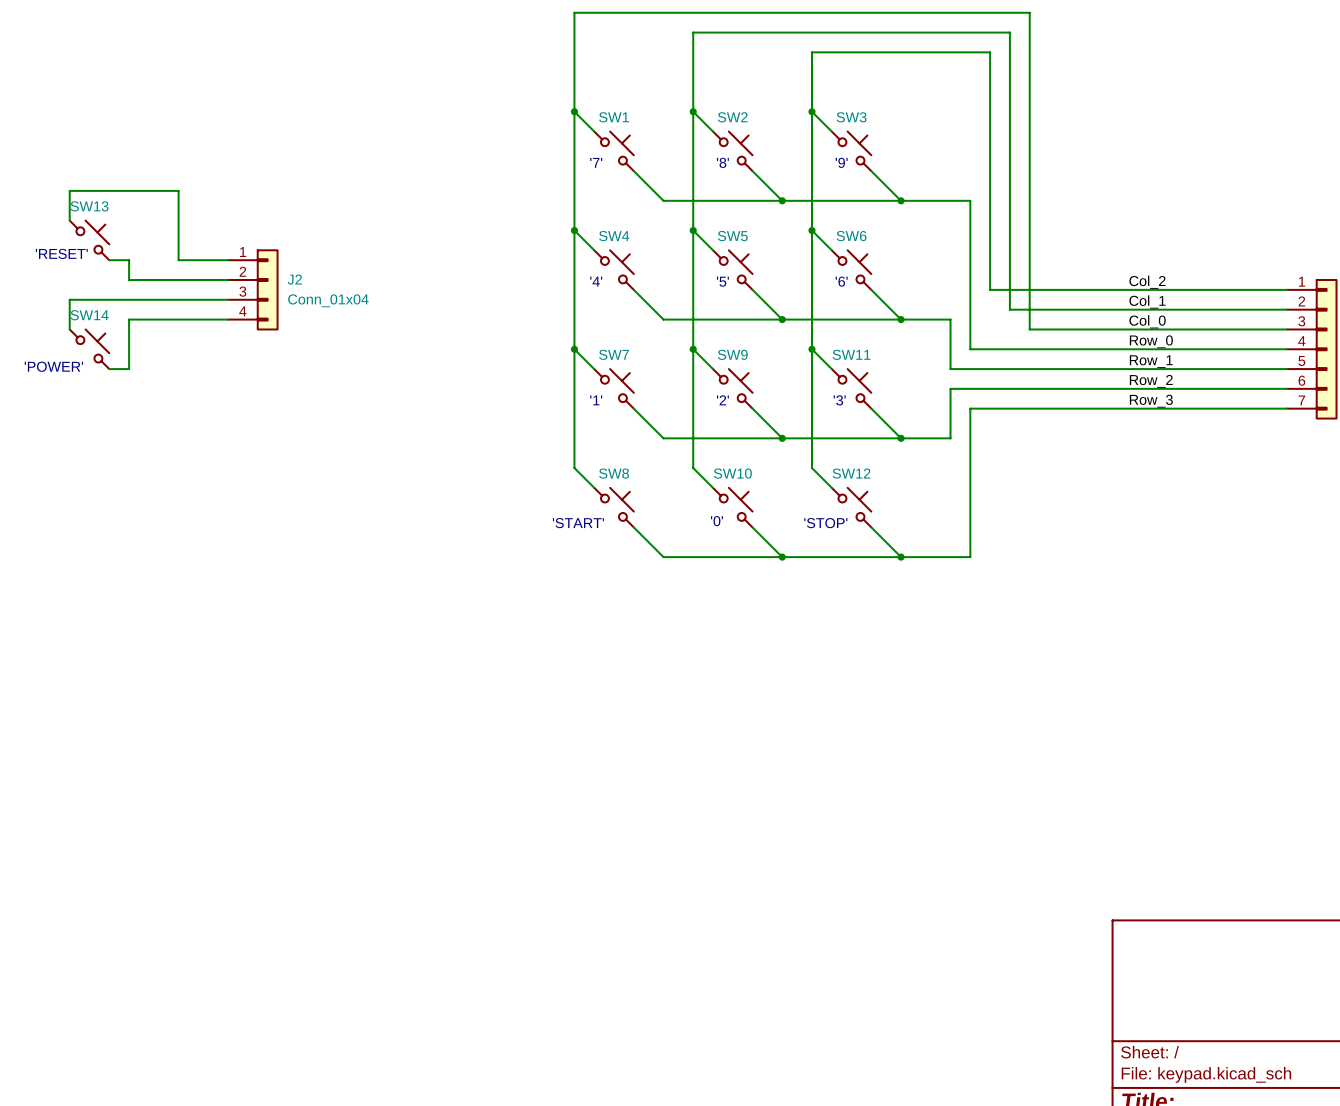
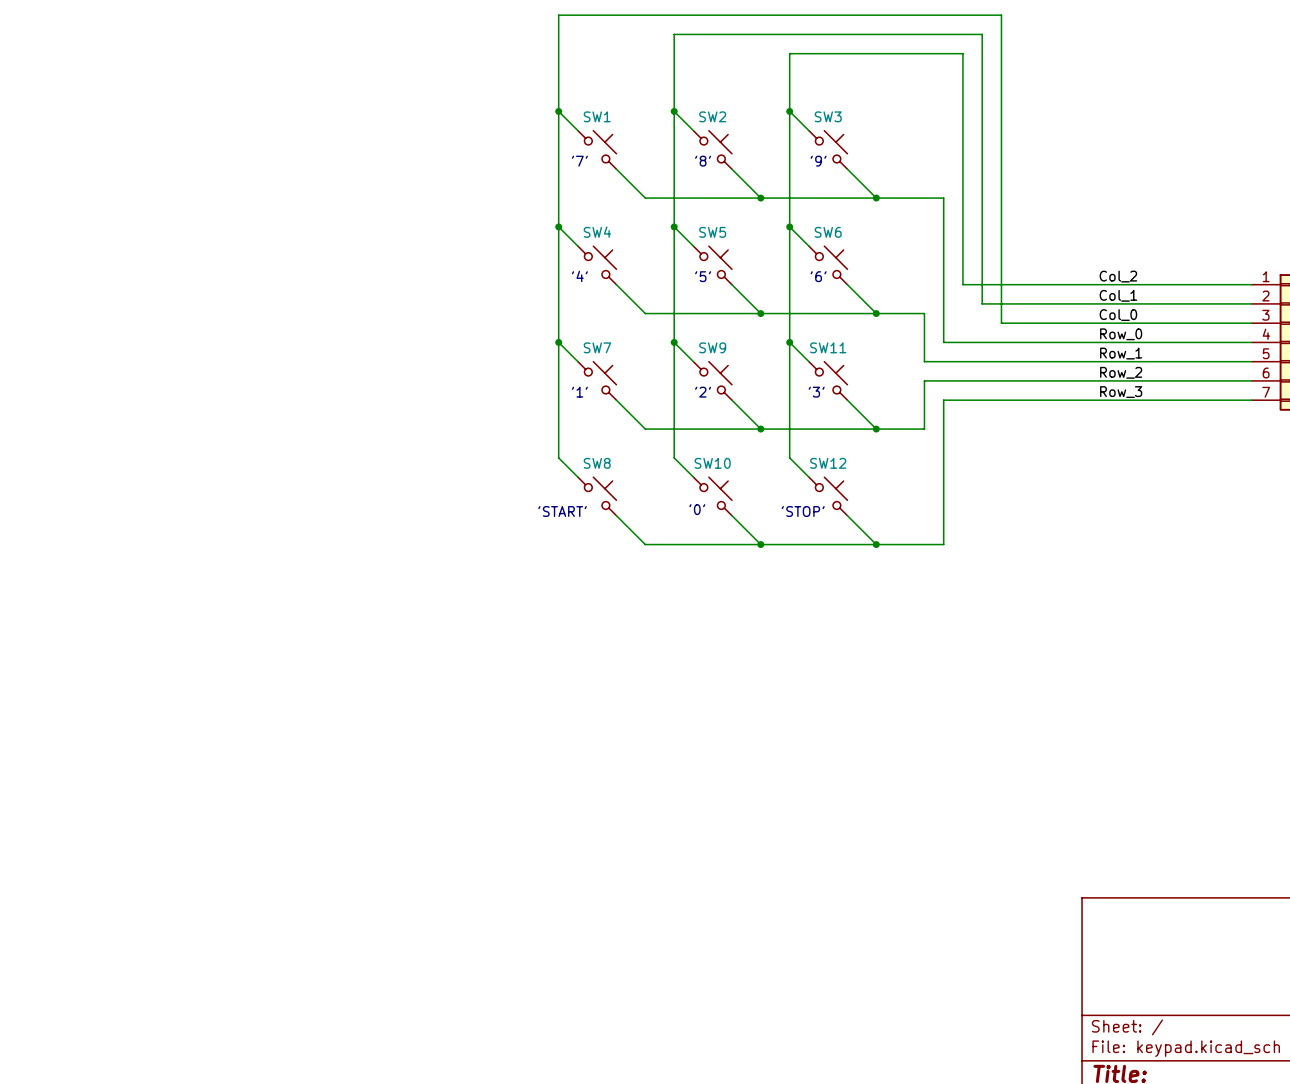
wire: (69, 220) (69, 190) (178, 190) (178, 260) (228, 260) -> none
SW13: (89, 240) -> none
text: 'RESET' (61, 253) -> none
wire: (109, 260) (129, 260) (129, 279) (228, 279) -> none
J2: Conn_01x04 (253, 289) -> none
wire: (228, 299) (69, 299) (69, 329) -> none
wire: (228, 319) (129, 319) (129, 369) (109, 369) -> none
SW14: (89, 349) -> none
text: 'POWER' (53, 366) -> none

